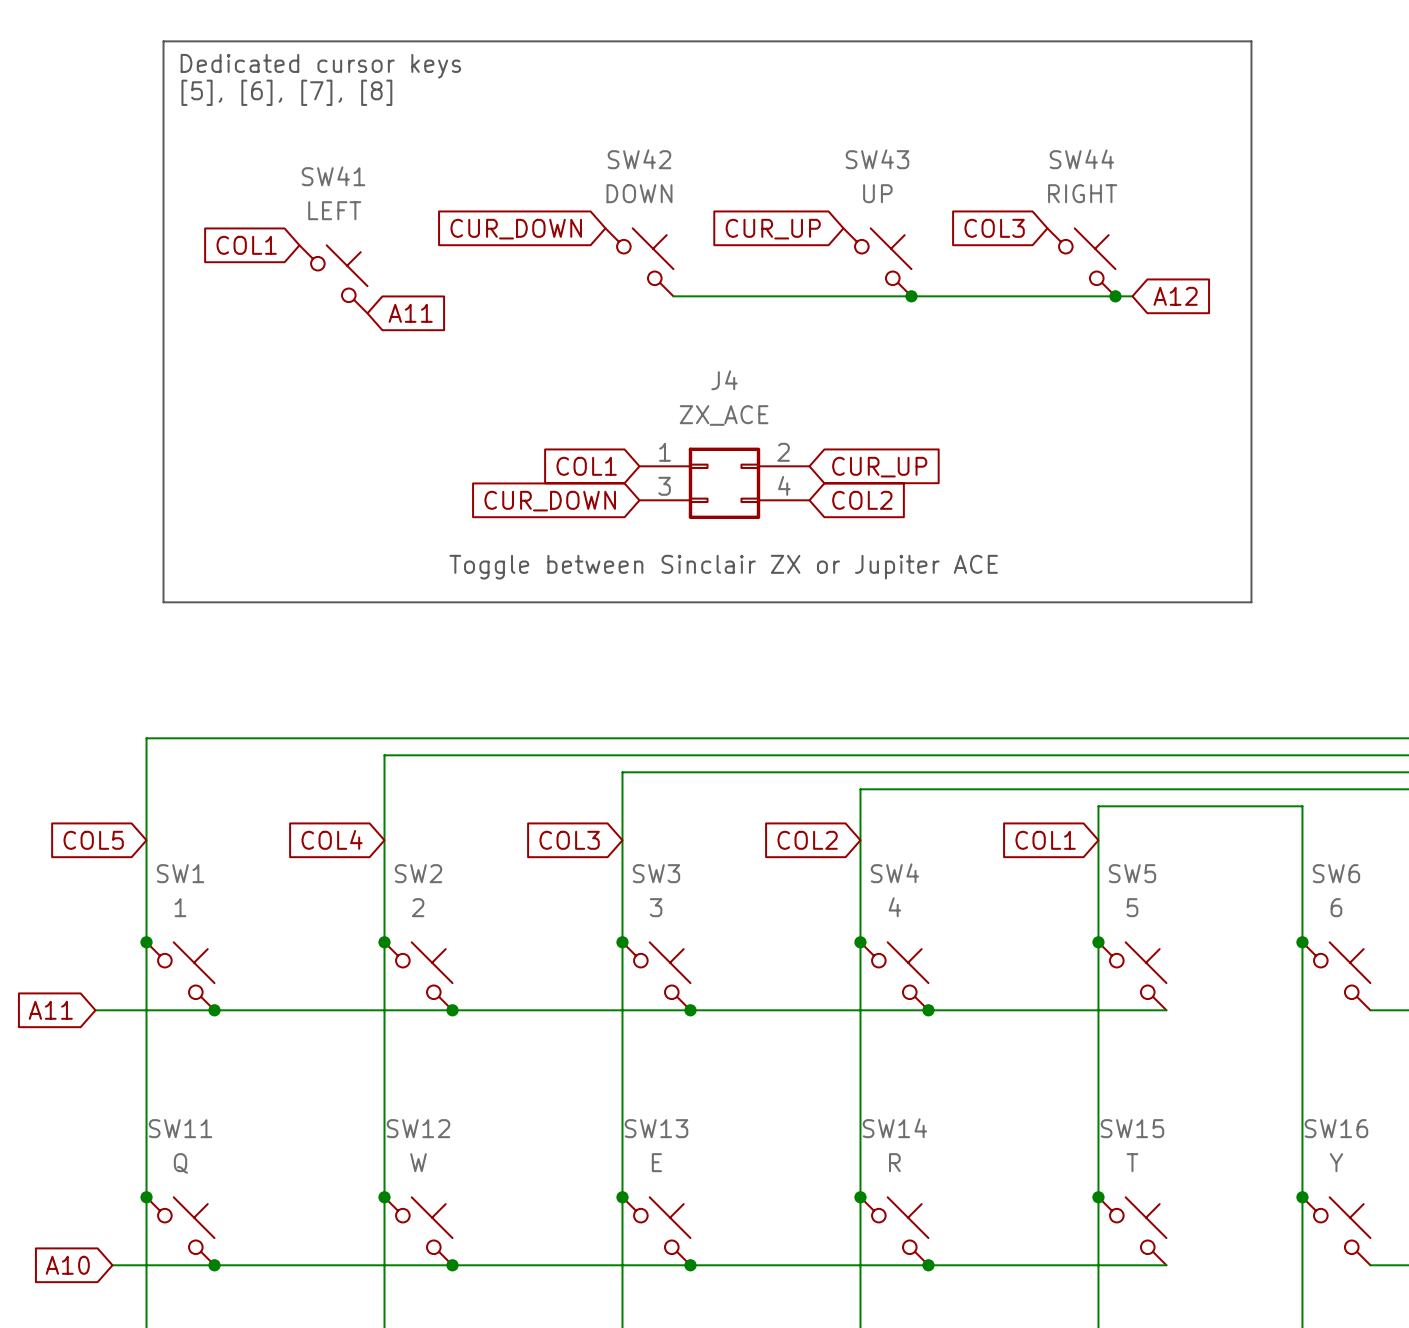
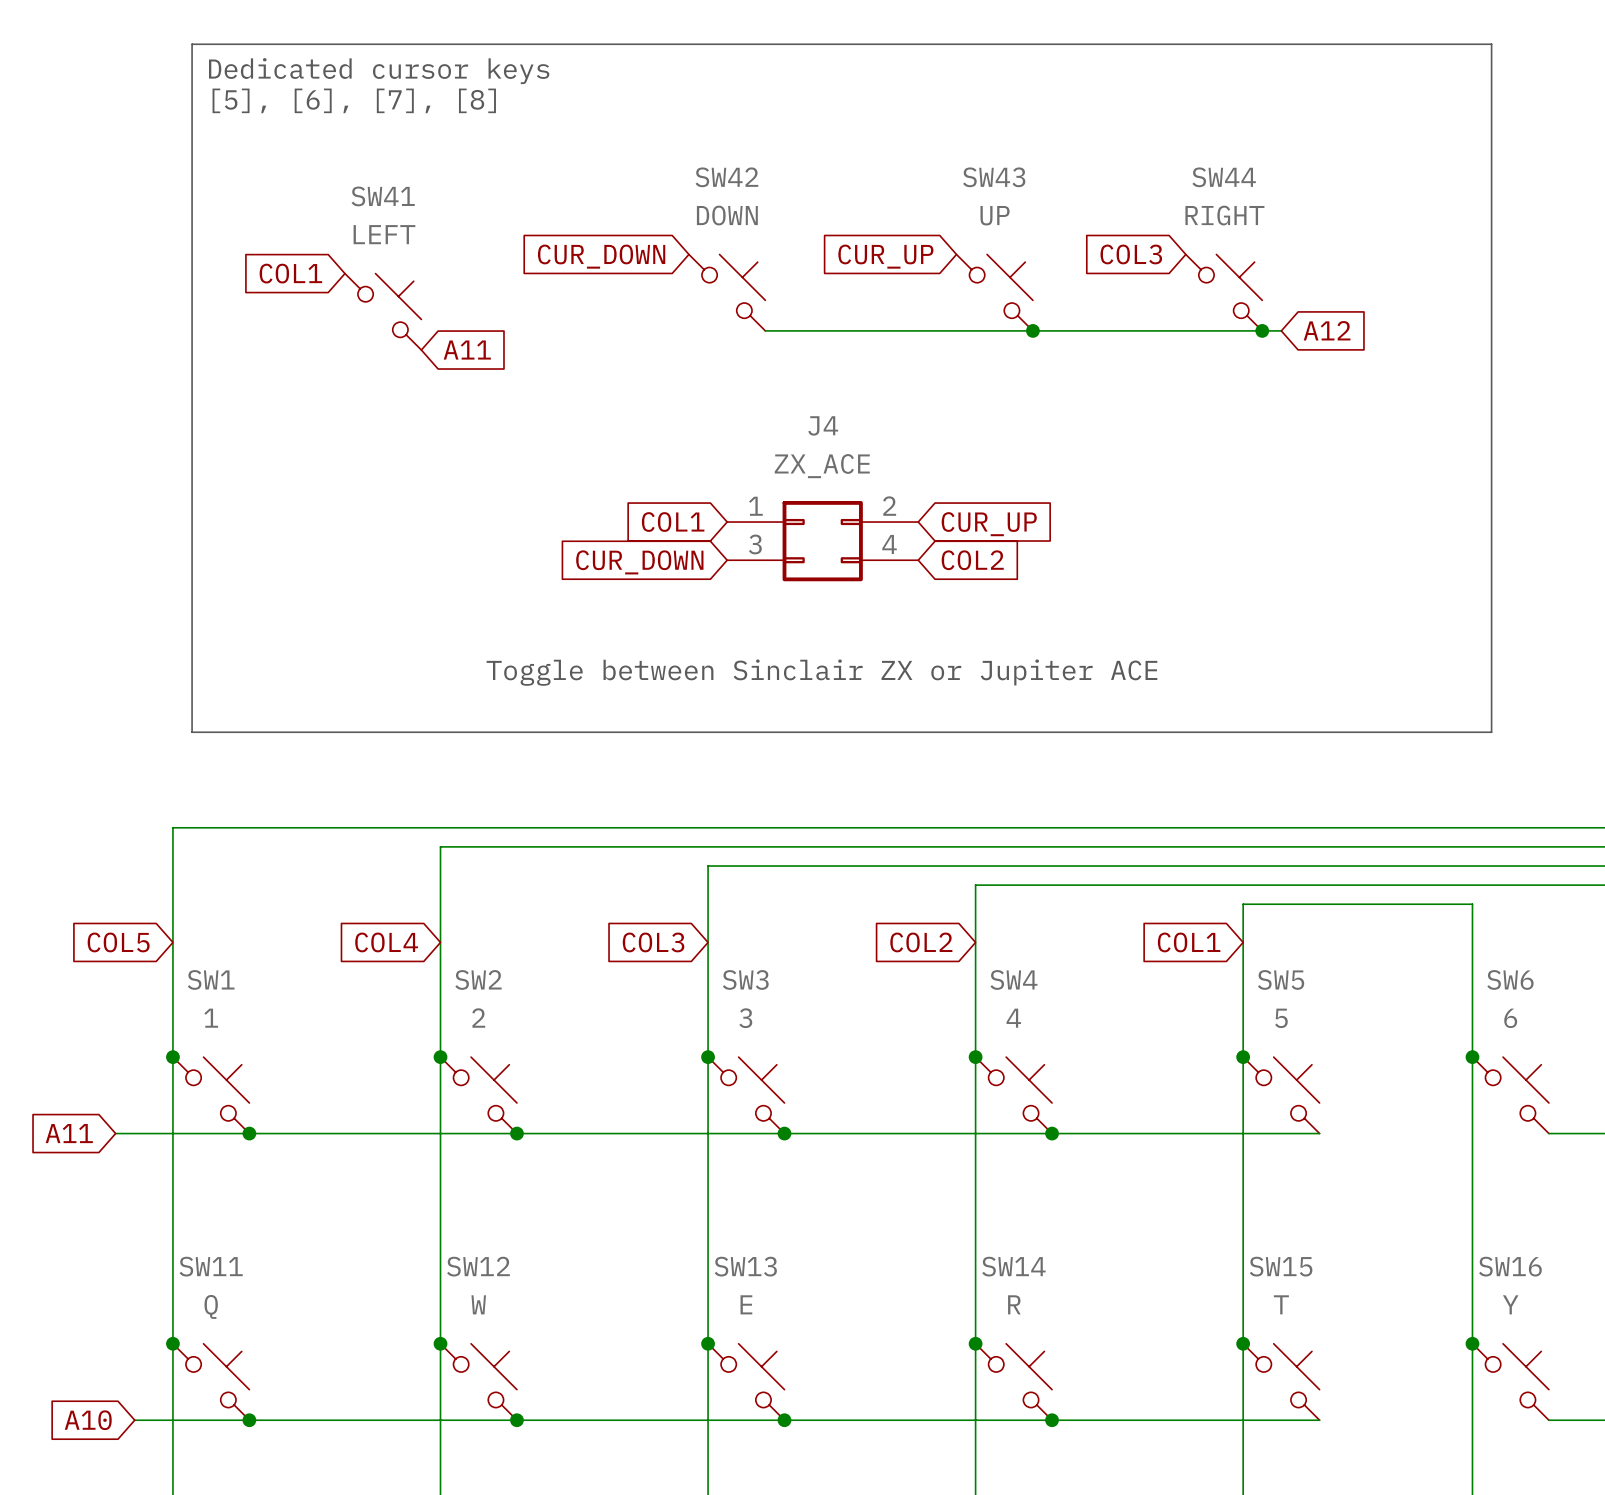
line: (1251, 41) (1251, 602) (163, 602) -> (1415, 44) (1491, 44) (1491, 732) (192, 732) (192, 674)
text position: Toggle between Sinclair ZX or Jupiter ACE (723, 567) -> Toggle between Sinclair ZX or Jupiter ACE (821, 672)

